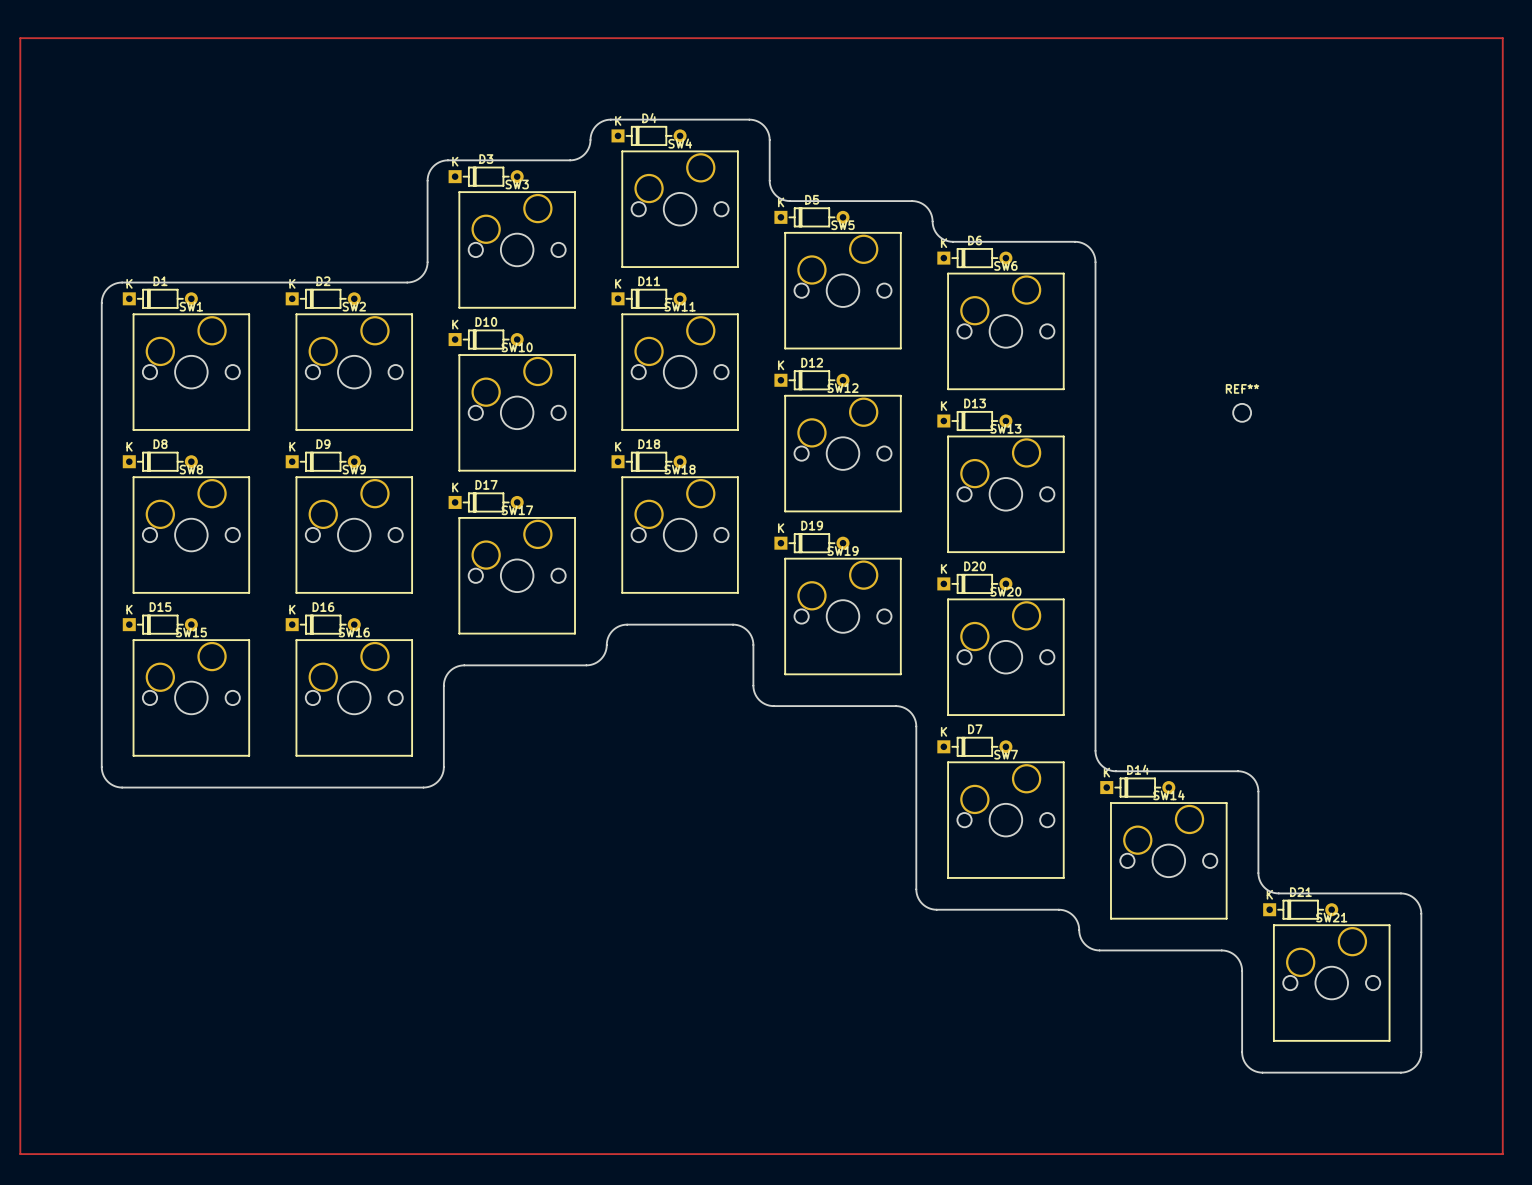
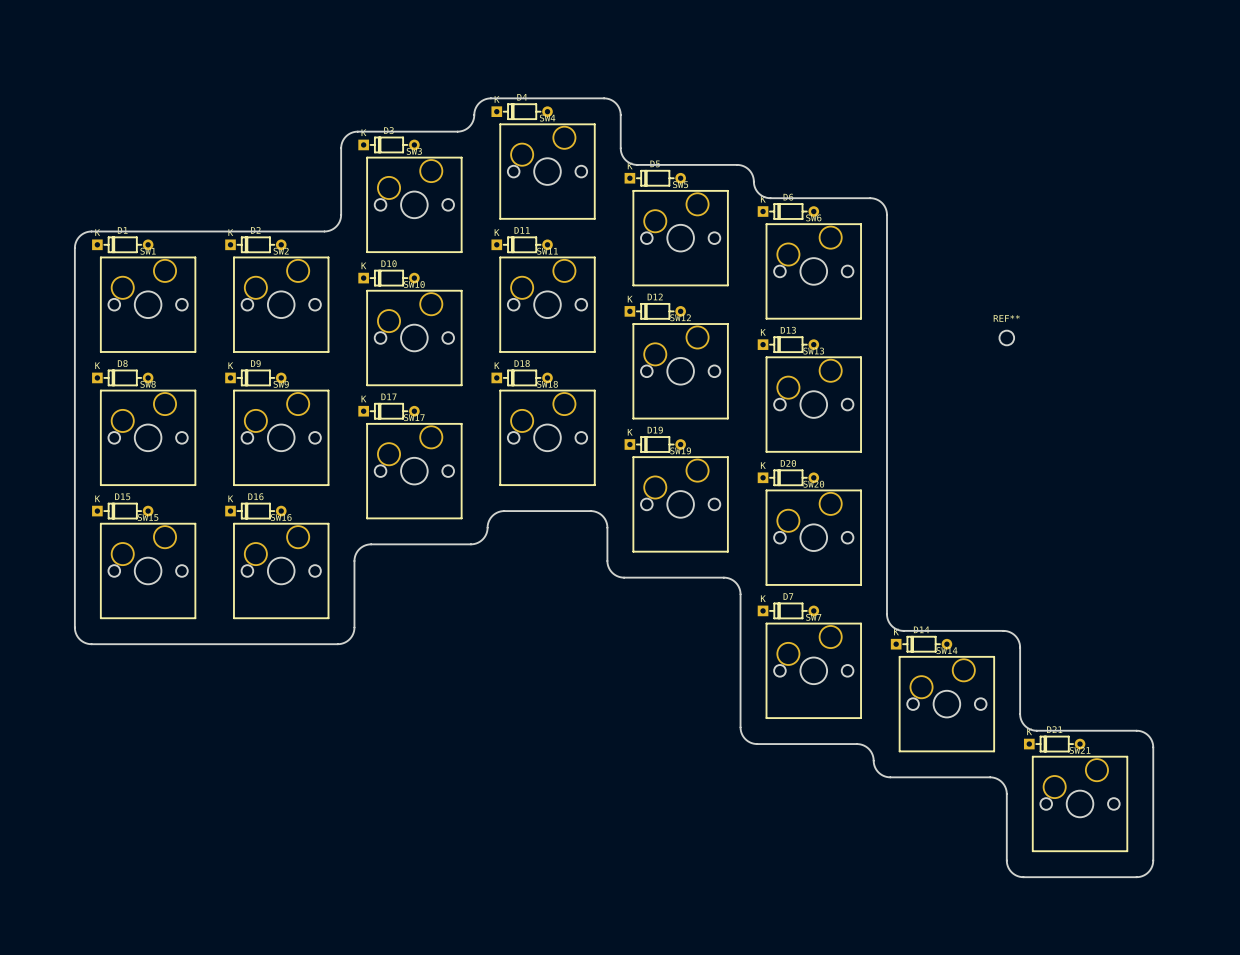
track: (20, 38) (1502, 38) (1502, 1154) (20, 1154) (20, 38) -> none

